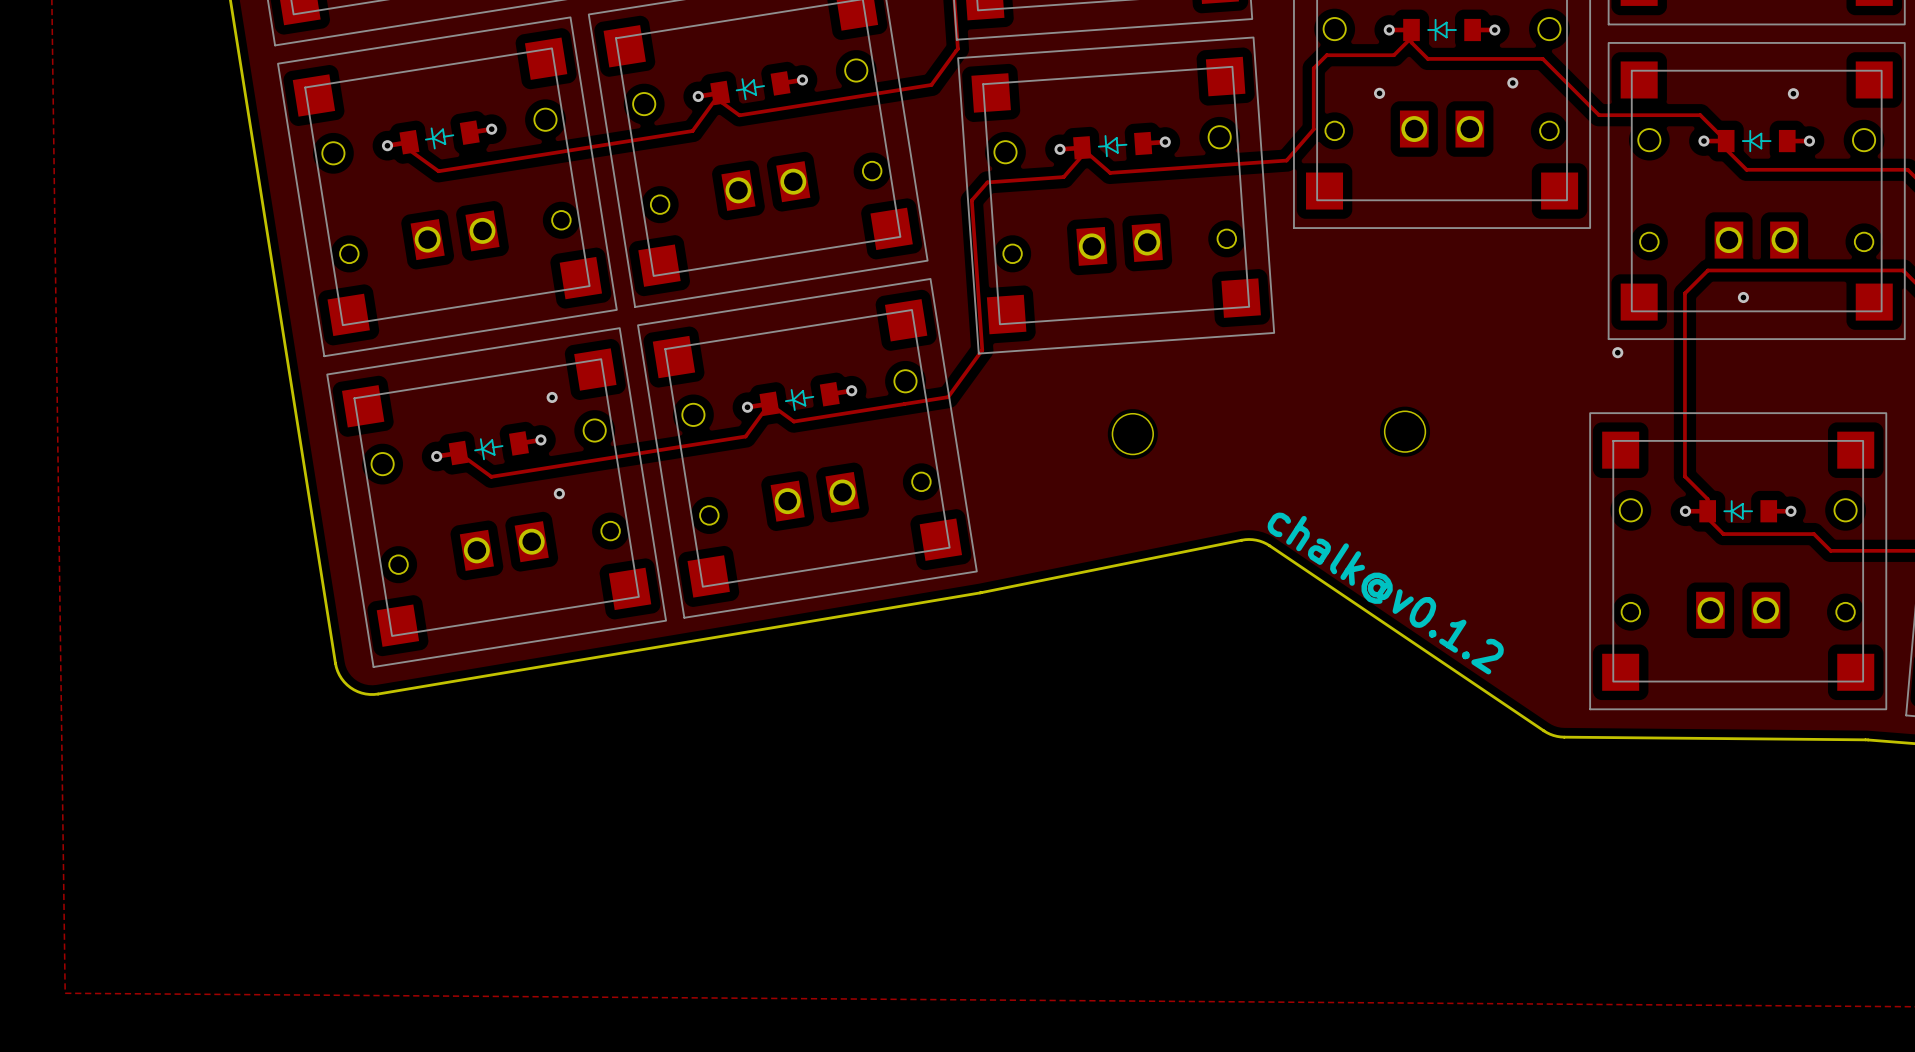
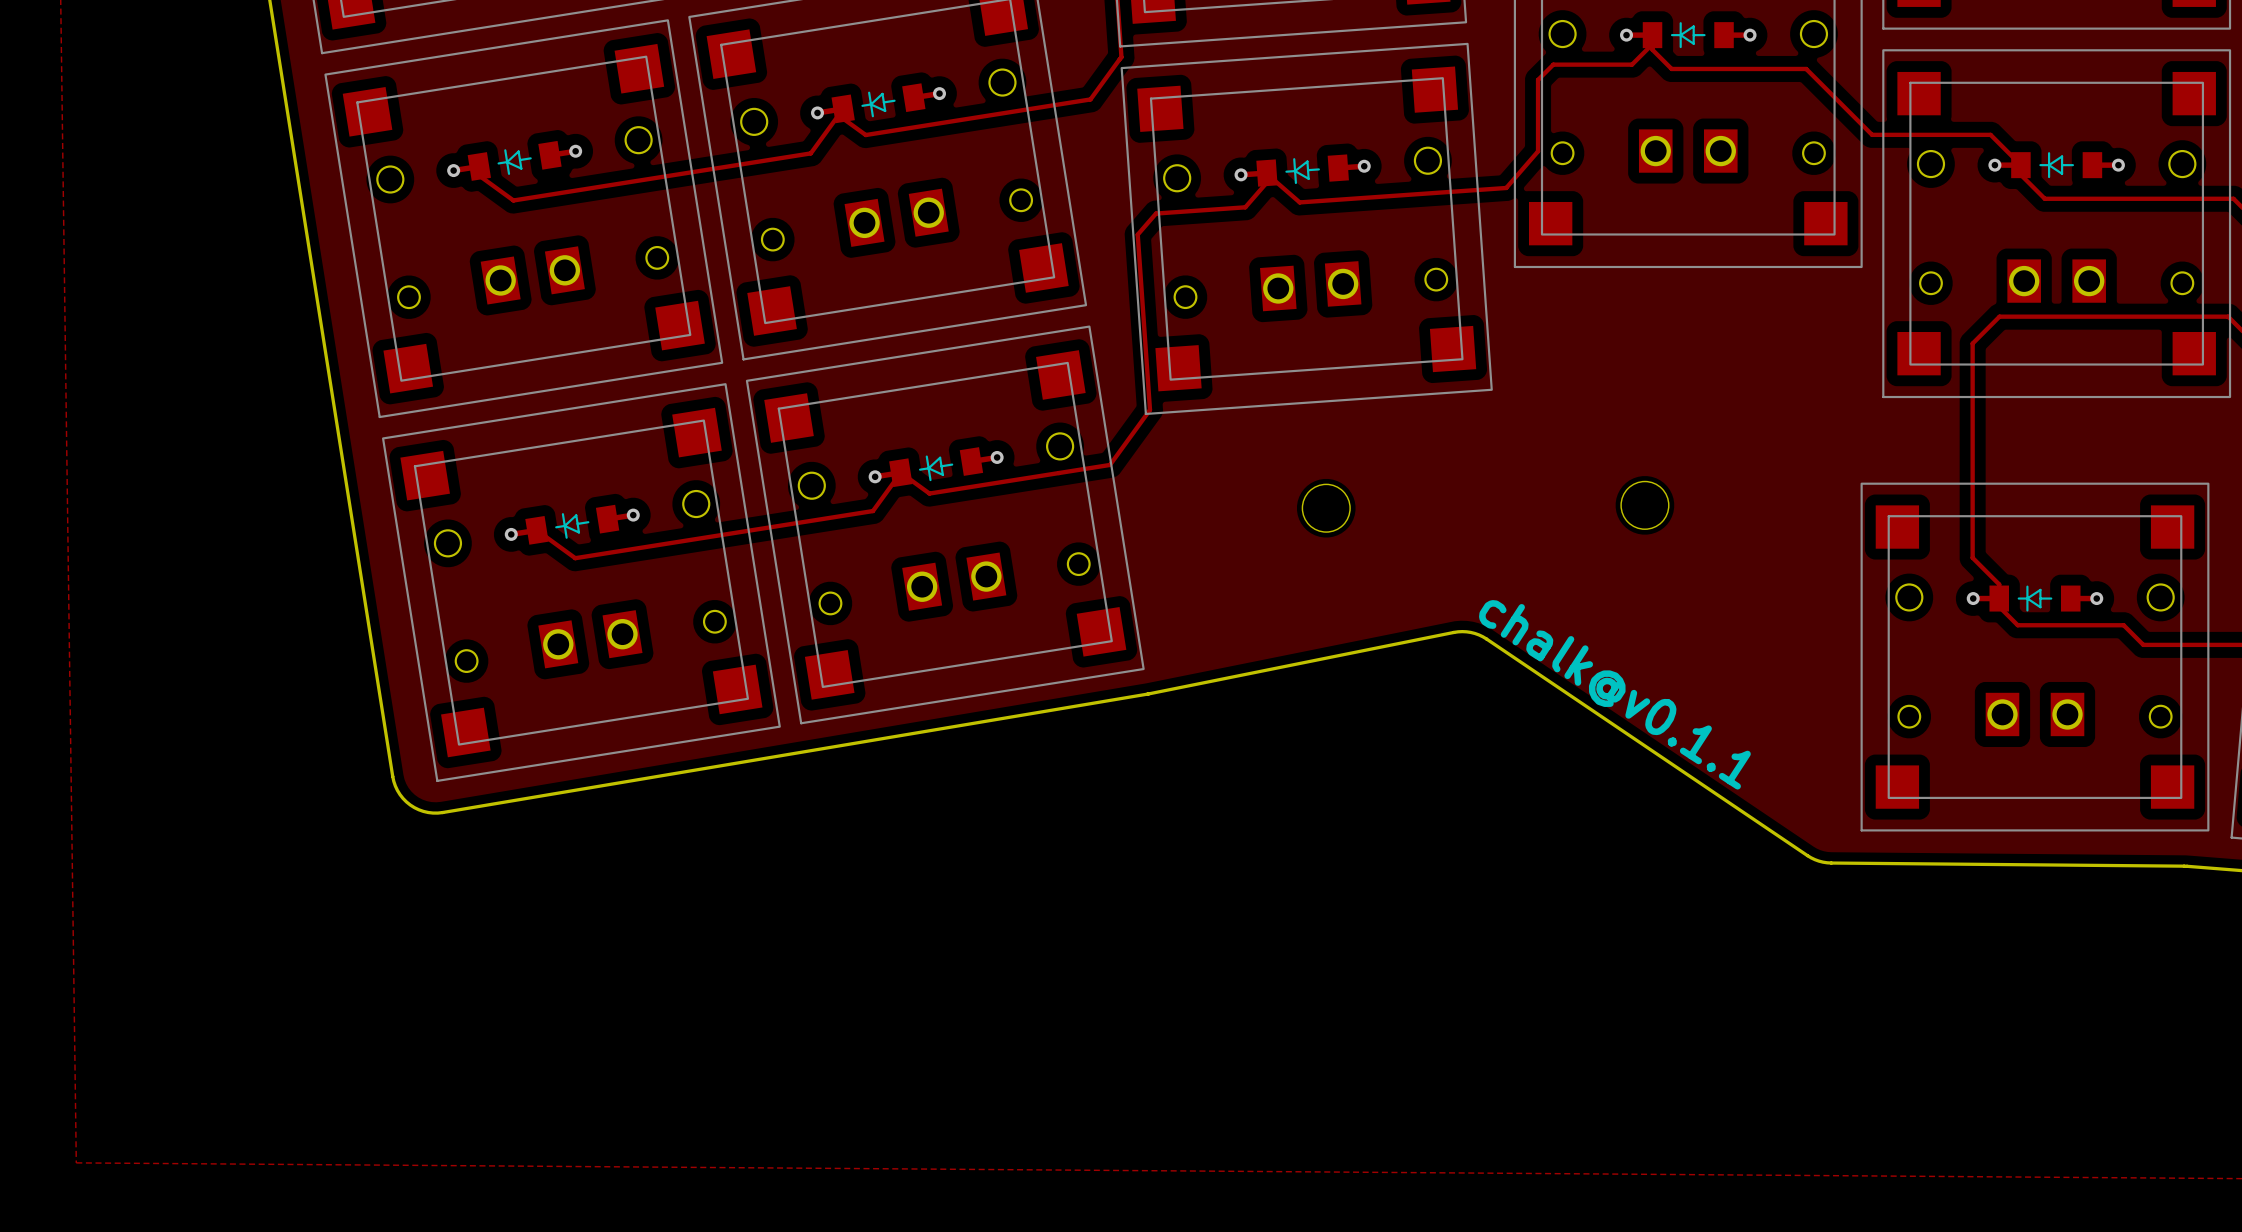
via: (1512, 82) -> none
via: (1379, 93) -> none
via: (1793, 93) -> none
via: (1743, 297) -> none
via: (1617, 352) -> none
via: (552, 397) -> none
via: (559, 493) -> none
text: chalk@v0.1.2 (1385, 593) -> chalk@v0.1.1 (1614, 694)

